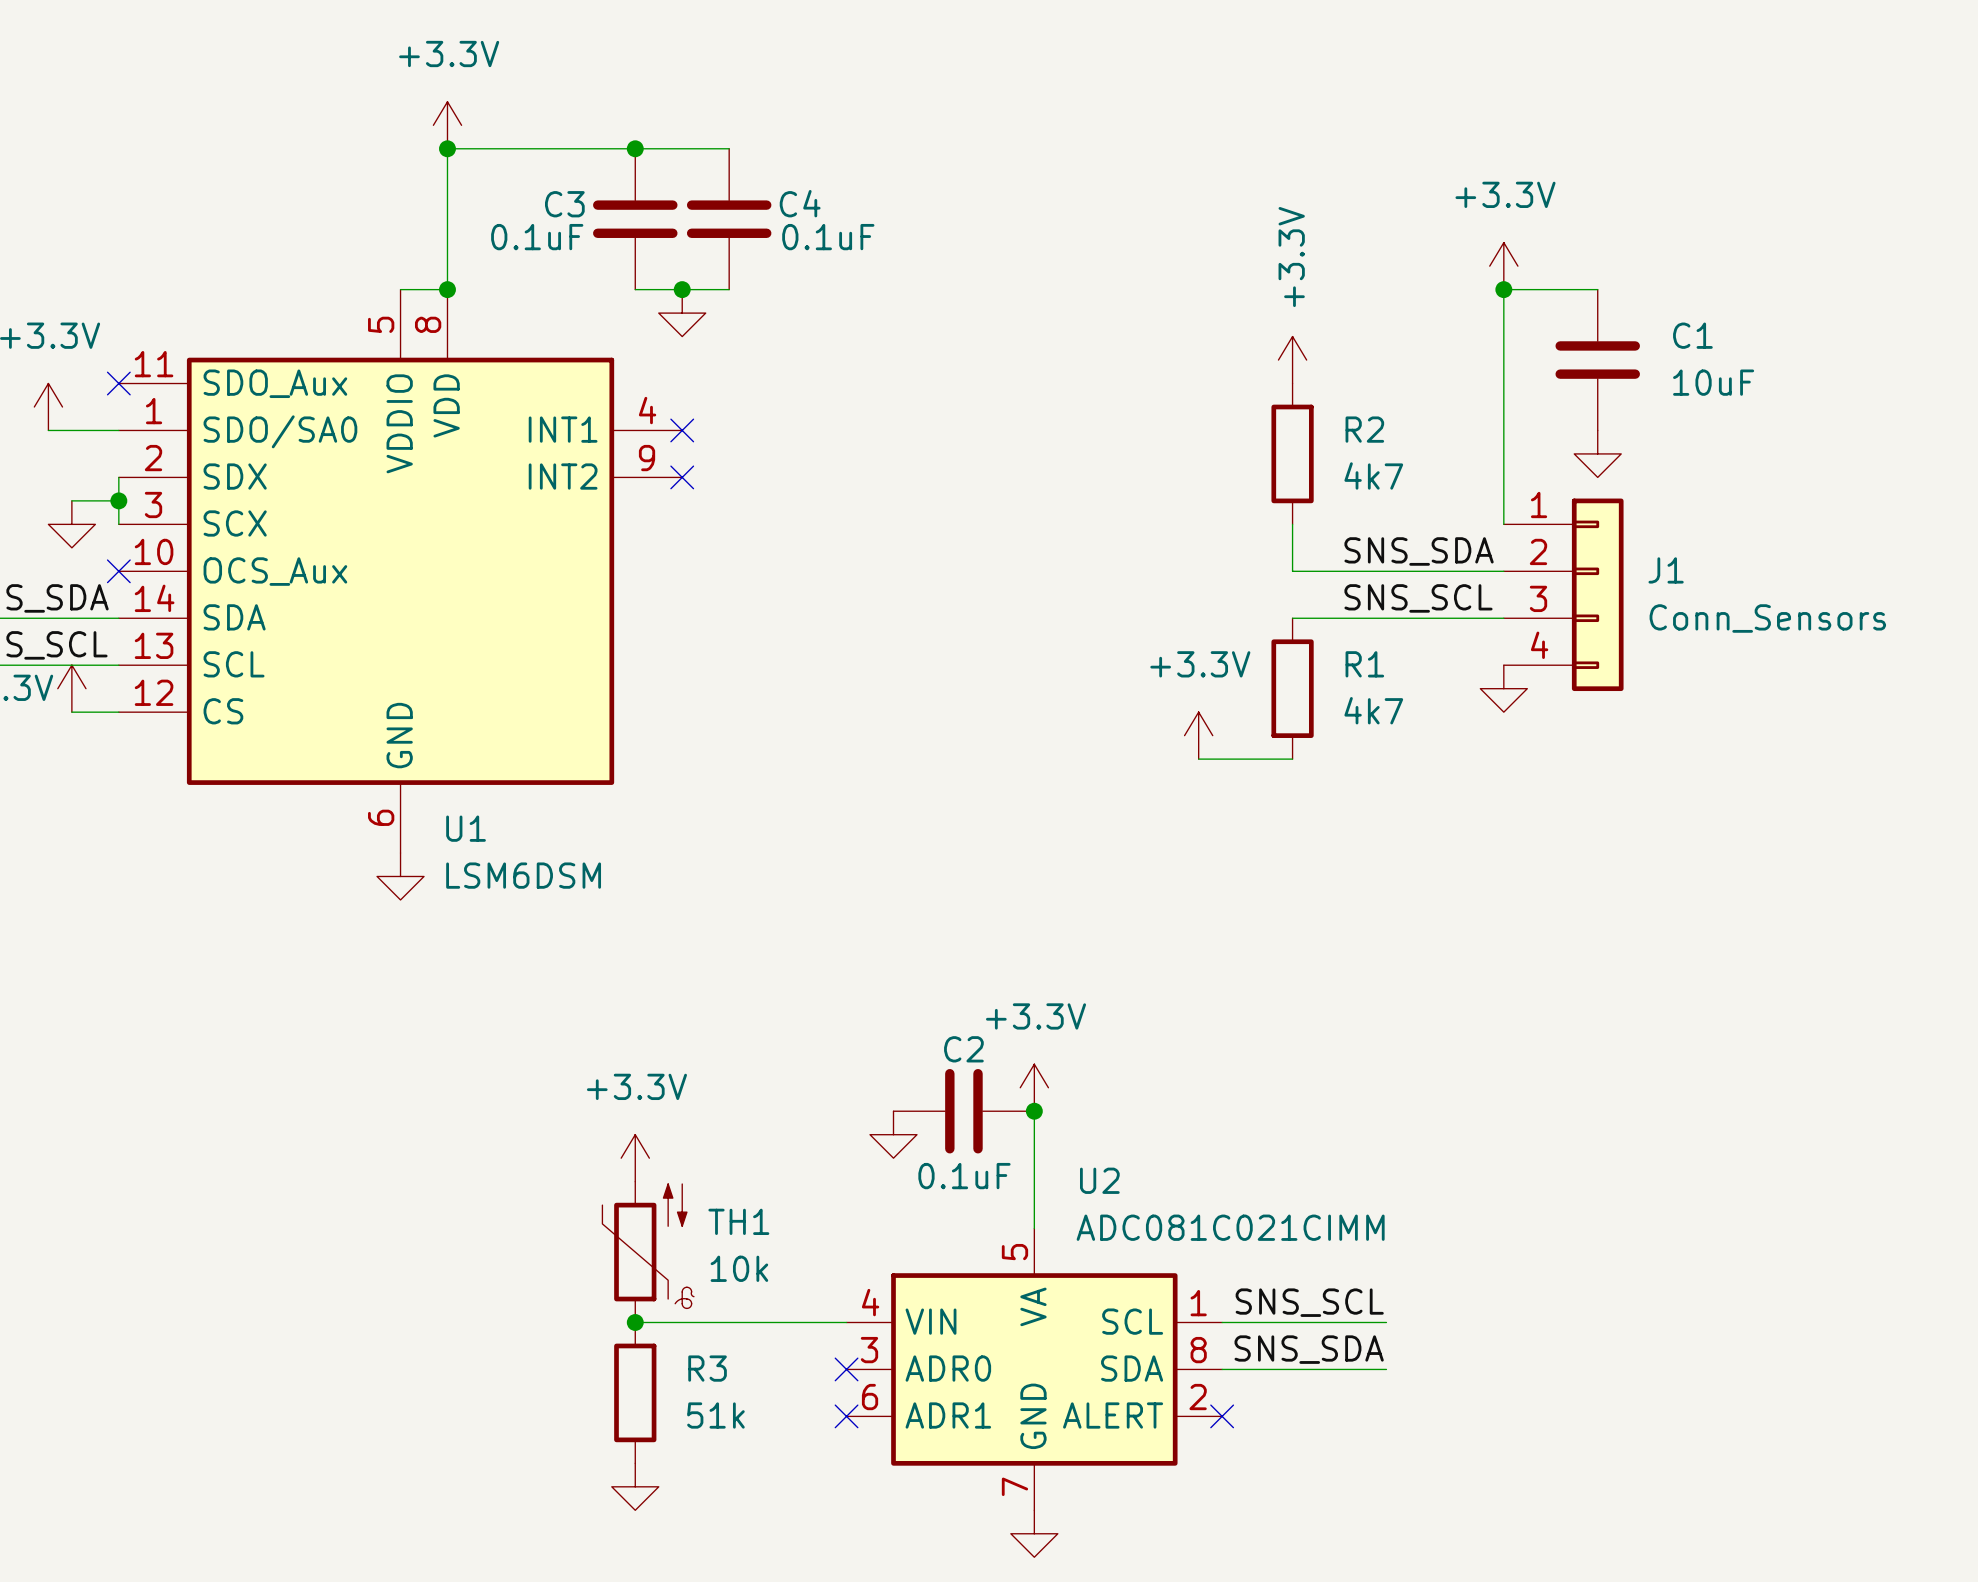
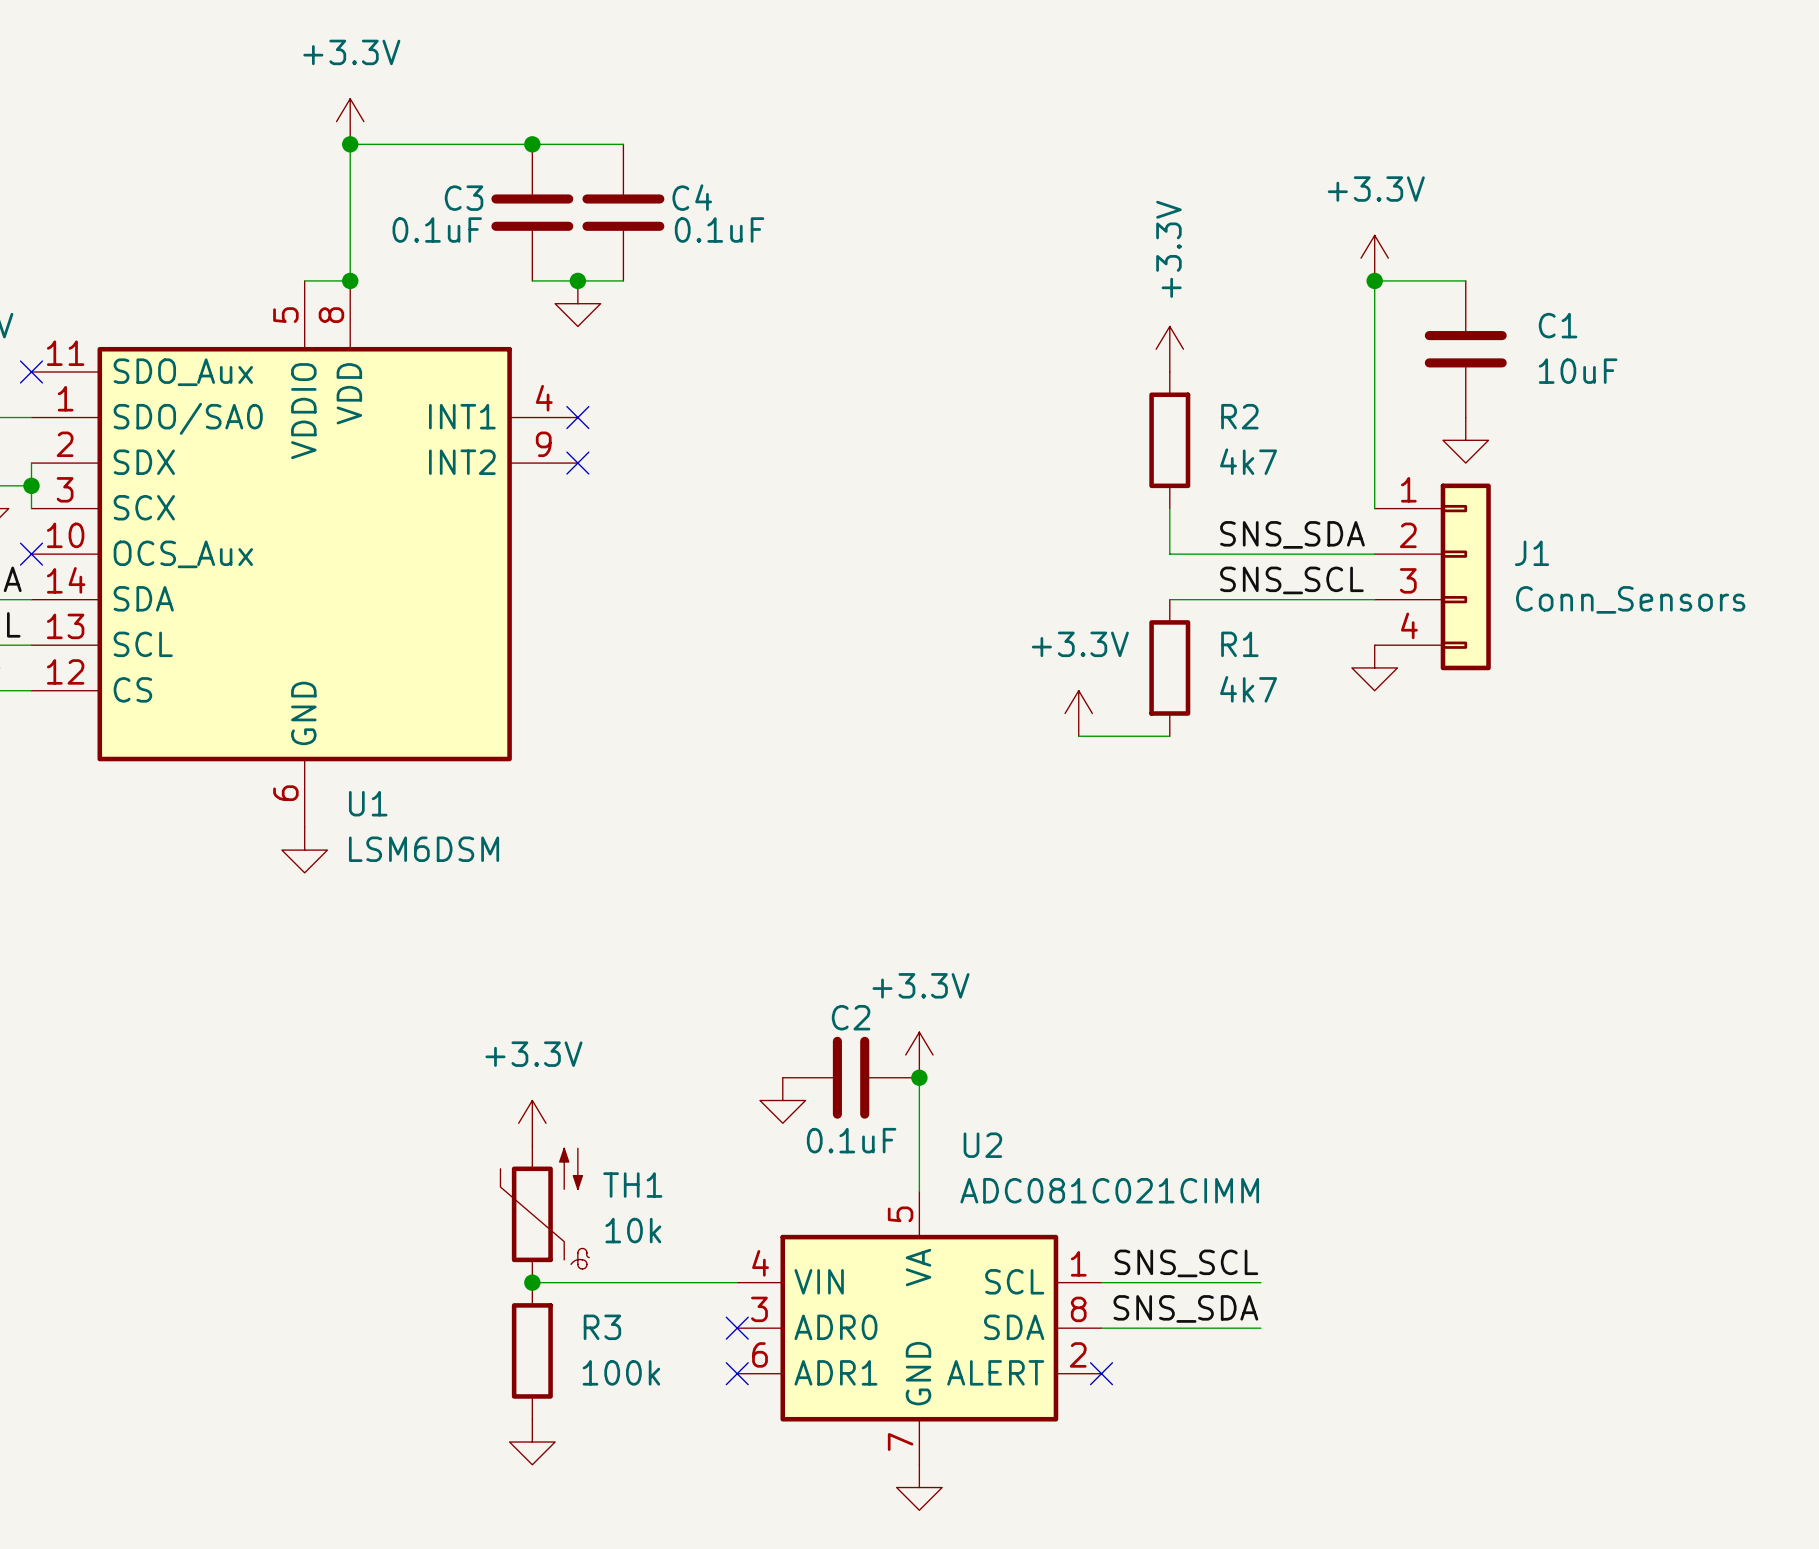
R3 value: 51k (715, 1415) -> 100k (621, 1372)

